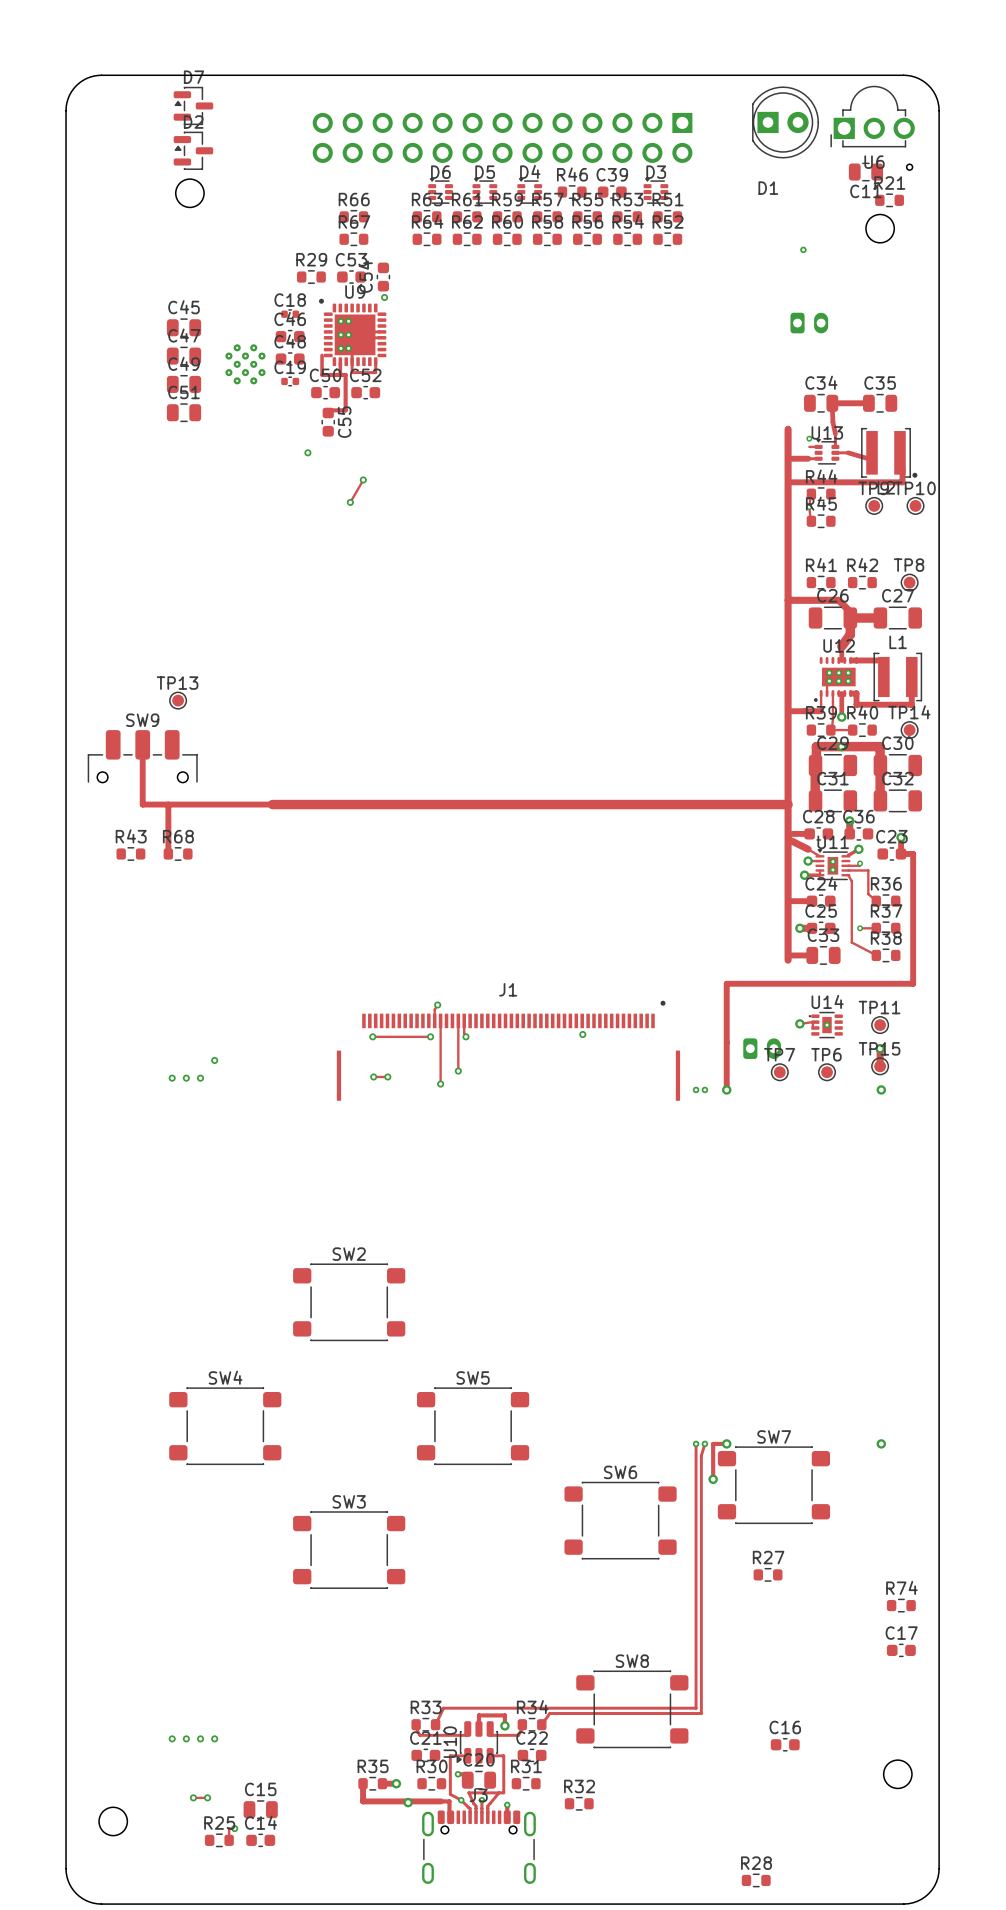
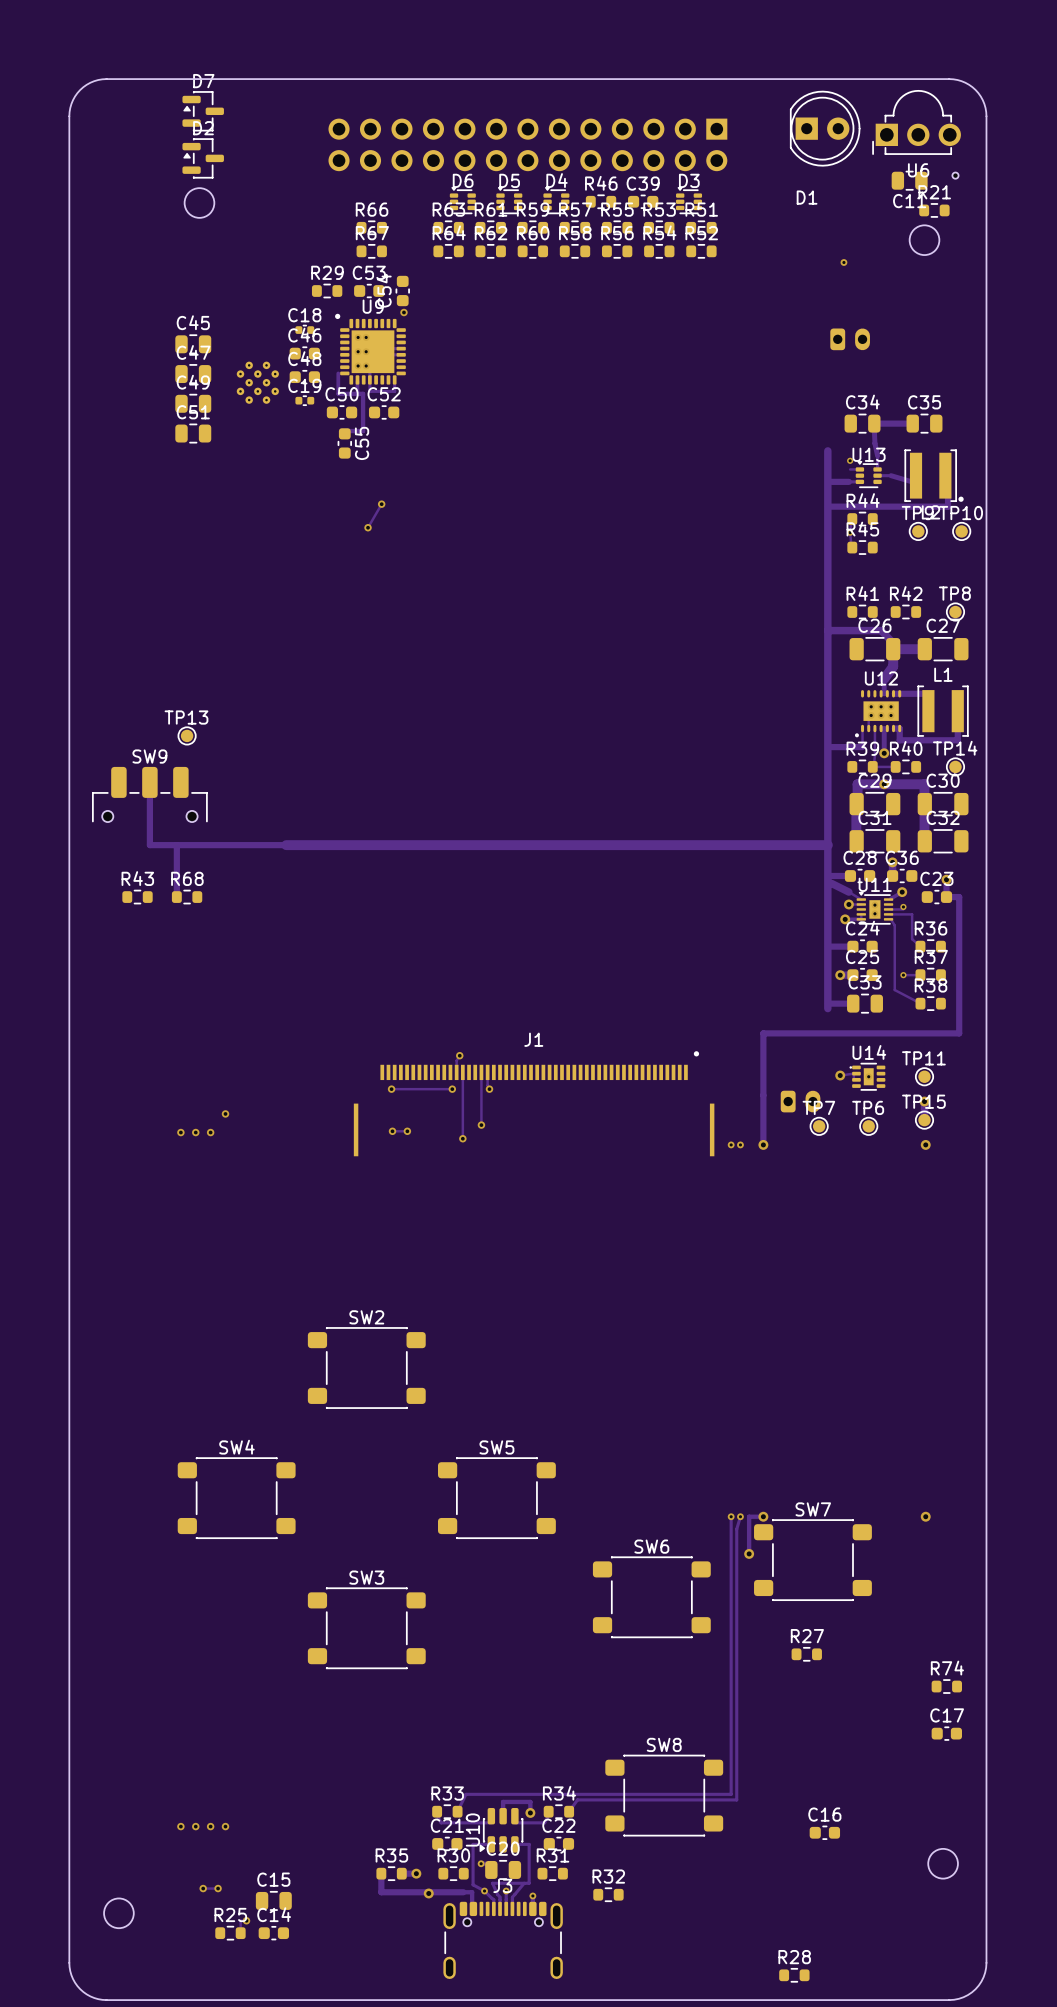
via: (307, 452) -> none
via: (582, 1034) -> none

